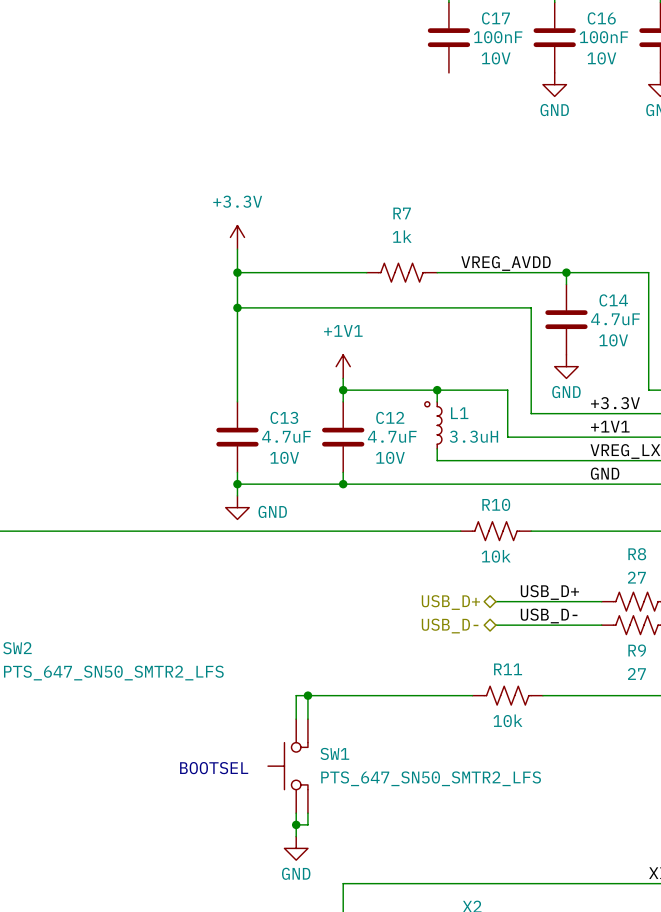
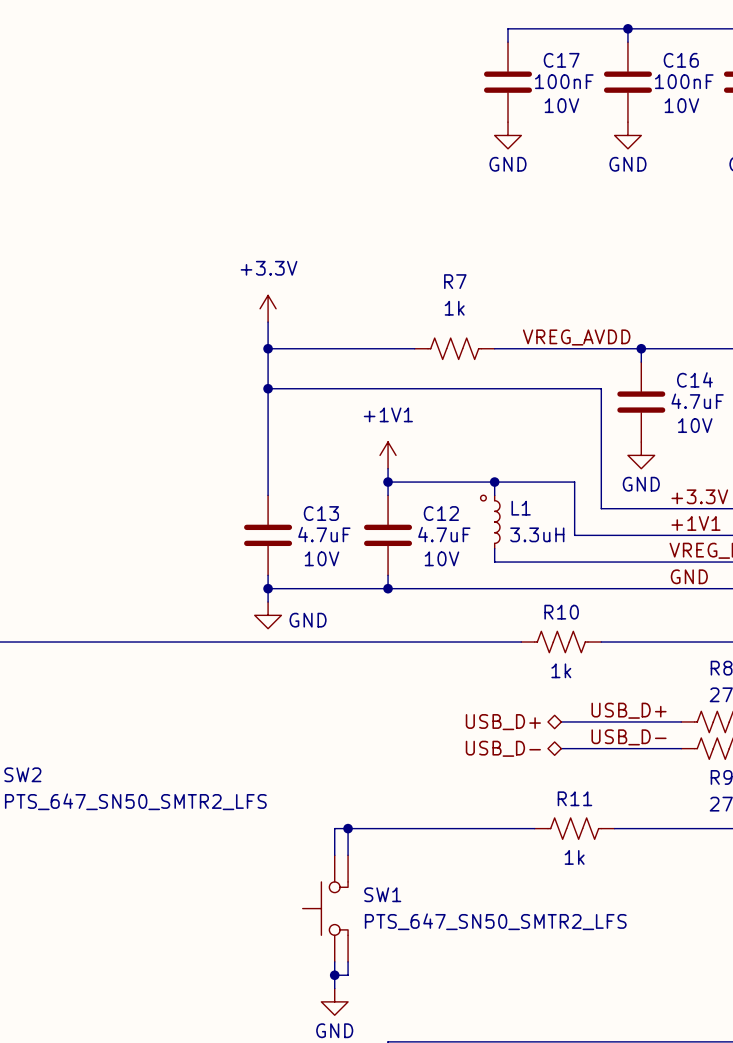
power symbol: none -> GND (508, 135)
R10 value: 10k (496, 556) -> 1k (561, 670)
R11 value: 10k (507, 720) -> 1k (574, 857)
text: BOOTSEL (214, 768) -> none

